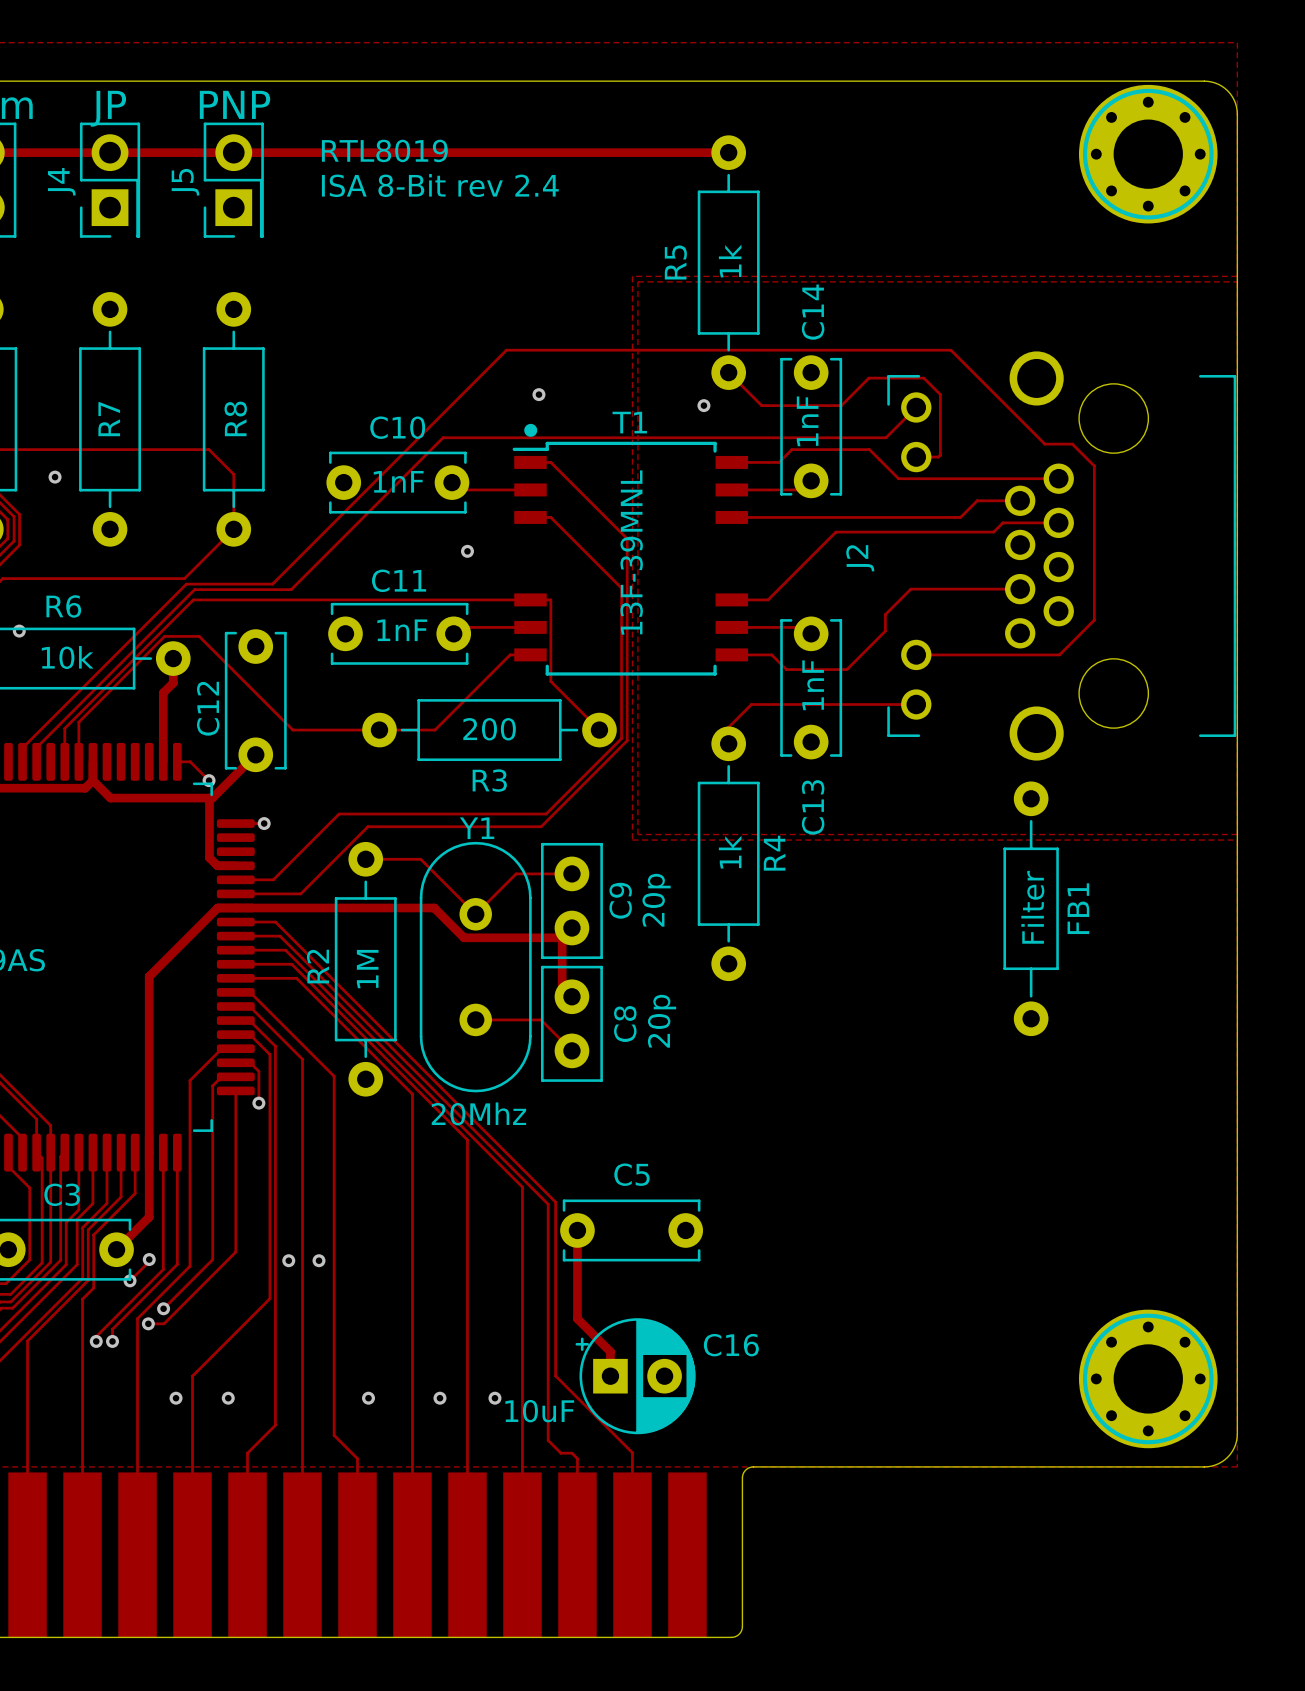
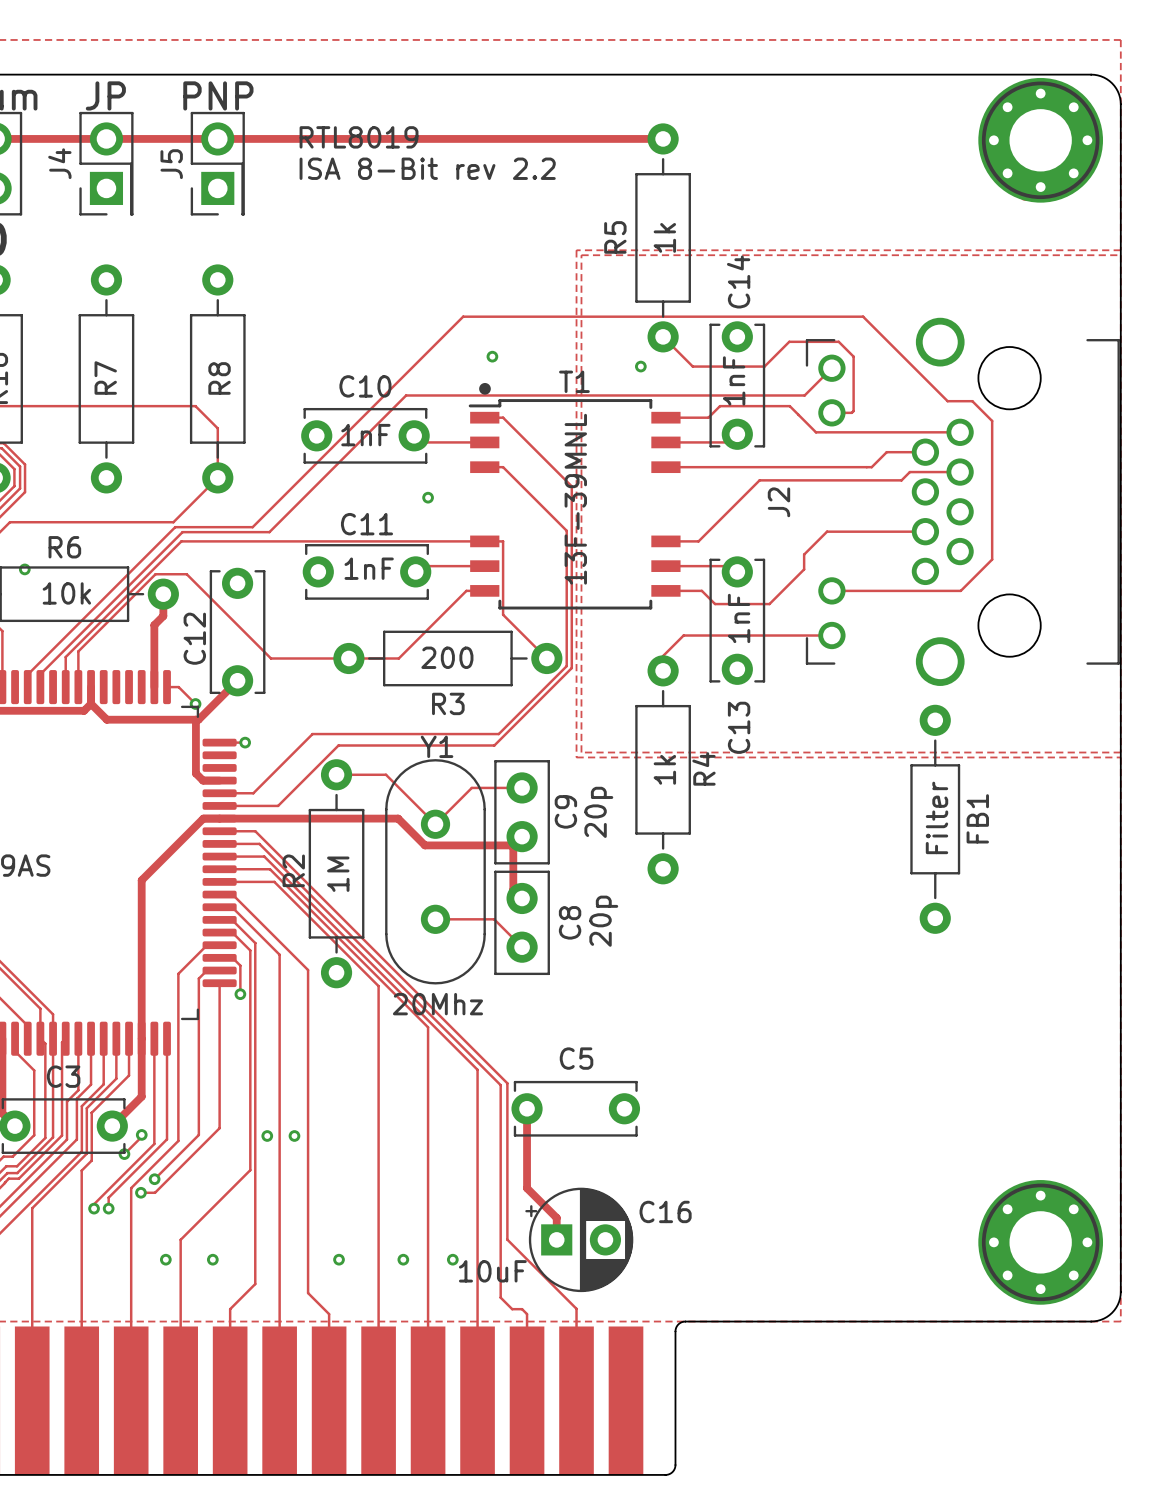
text: ISA 8-Bit rev 2.4 (440, 185) -> ISA 8-Bit rev 2.2 (427, 168)
via: (55, 477) -> none

